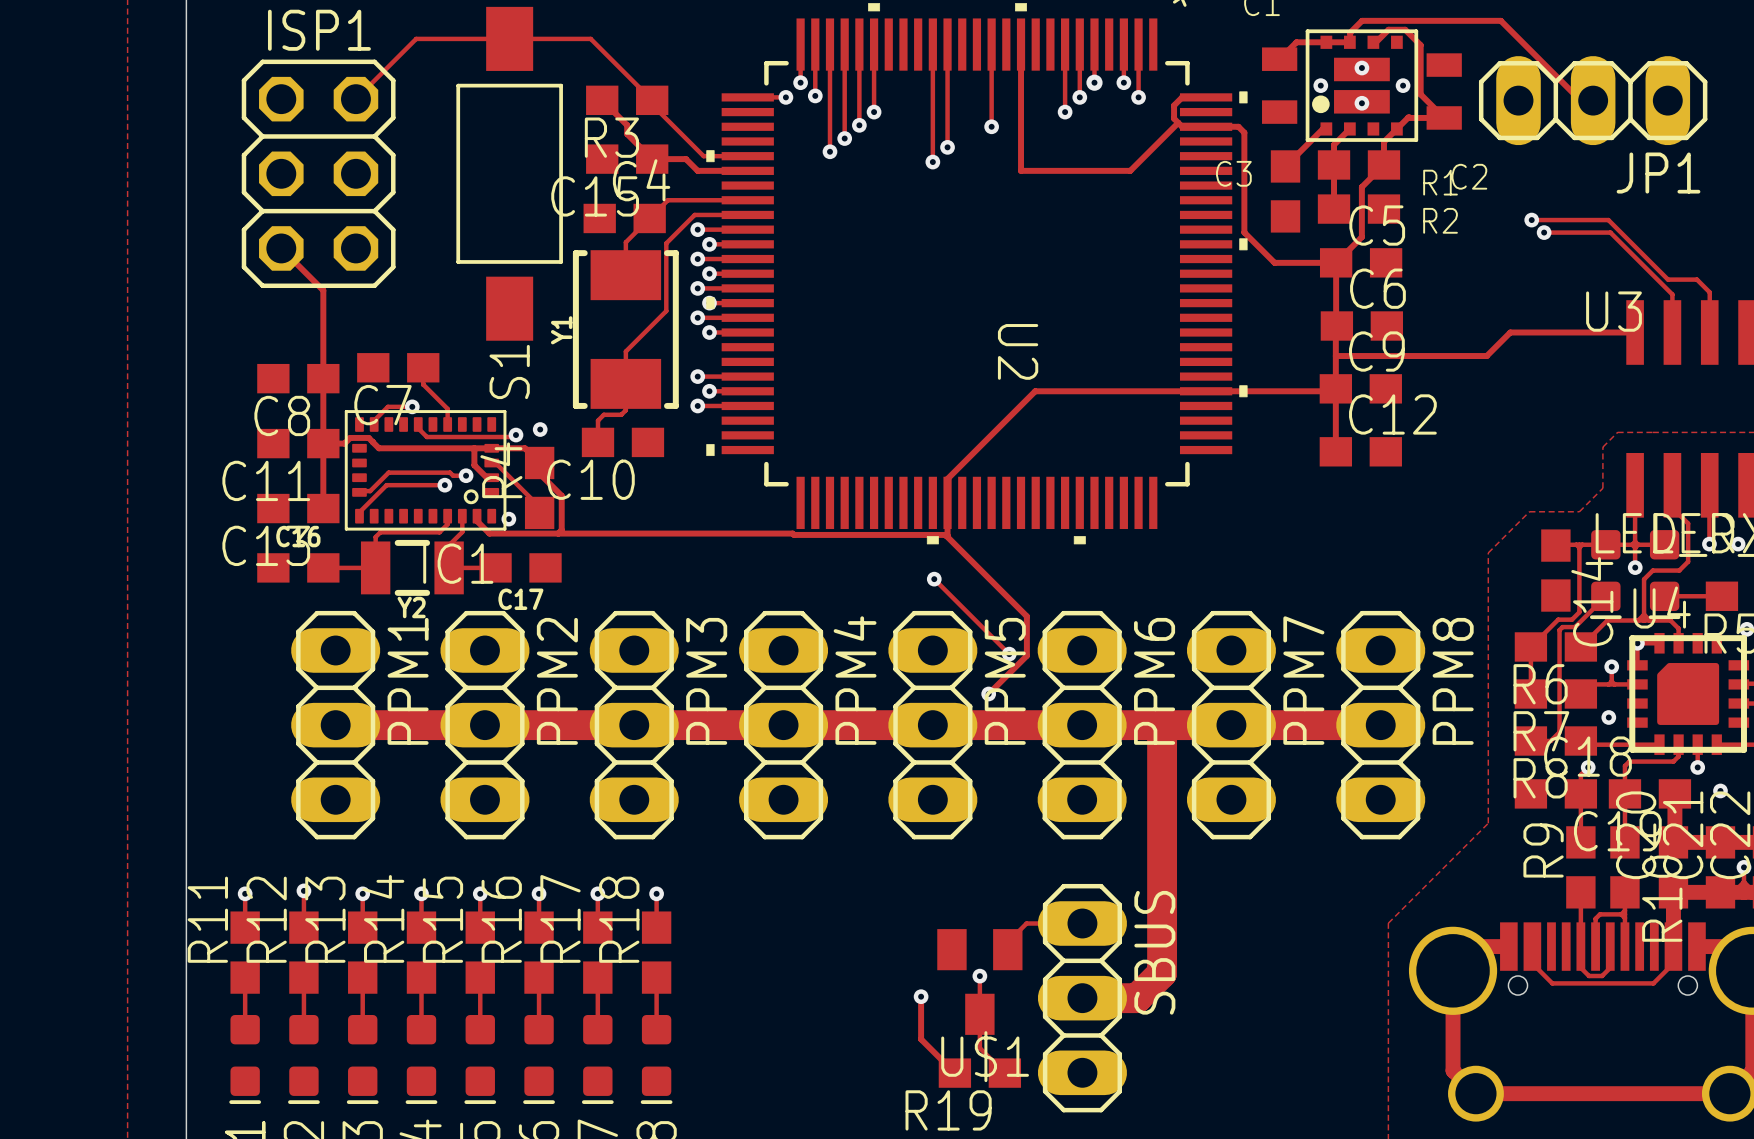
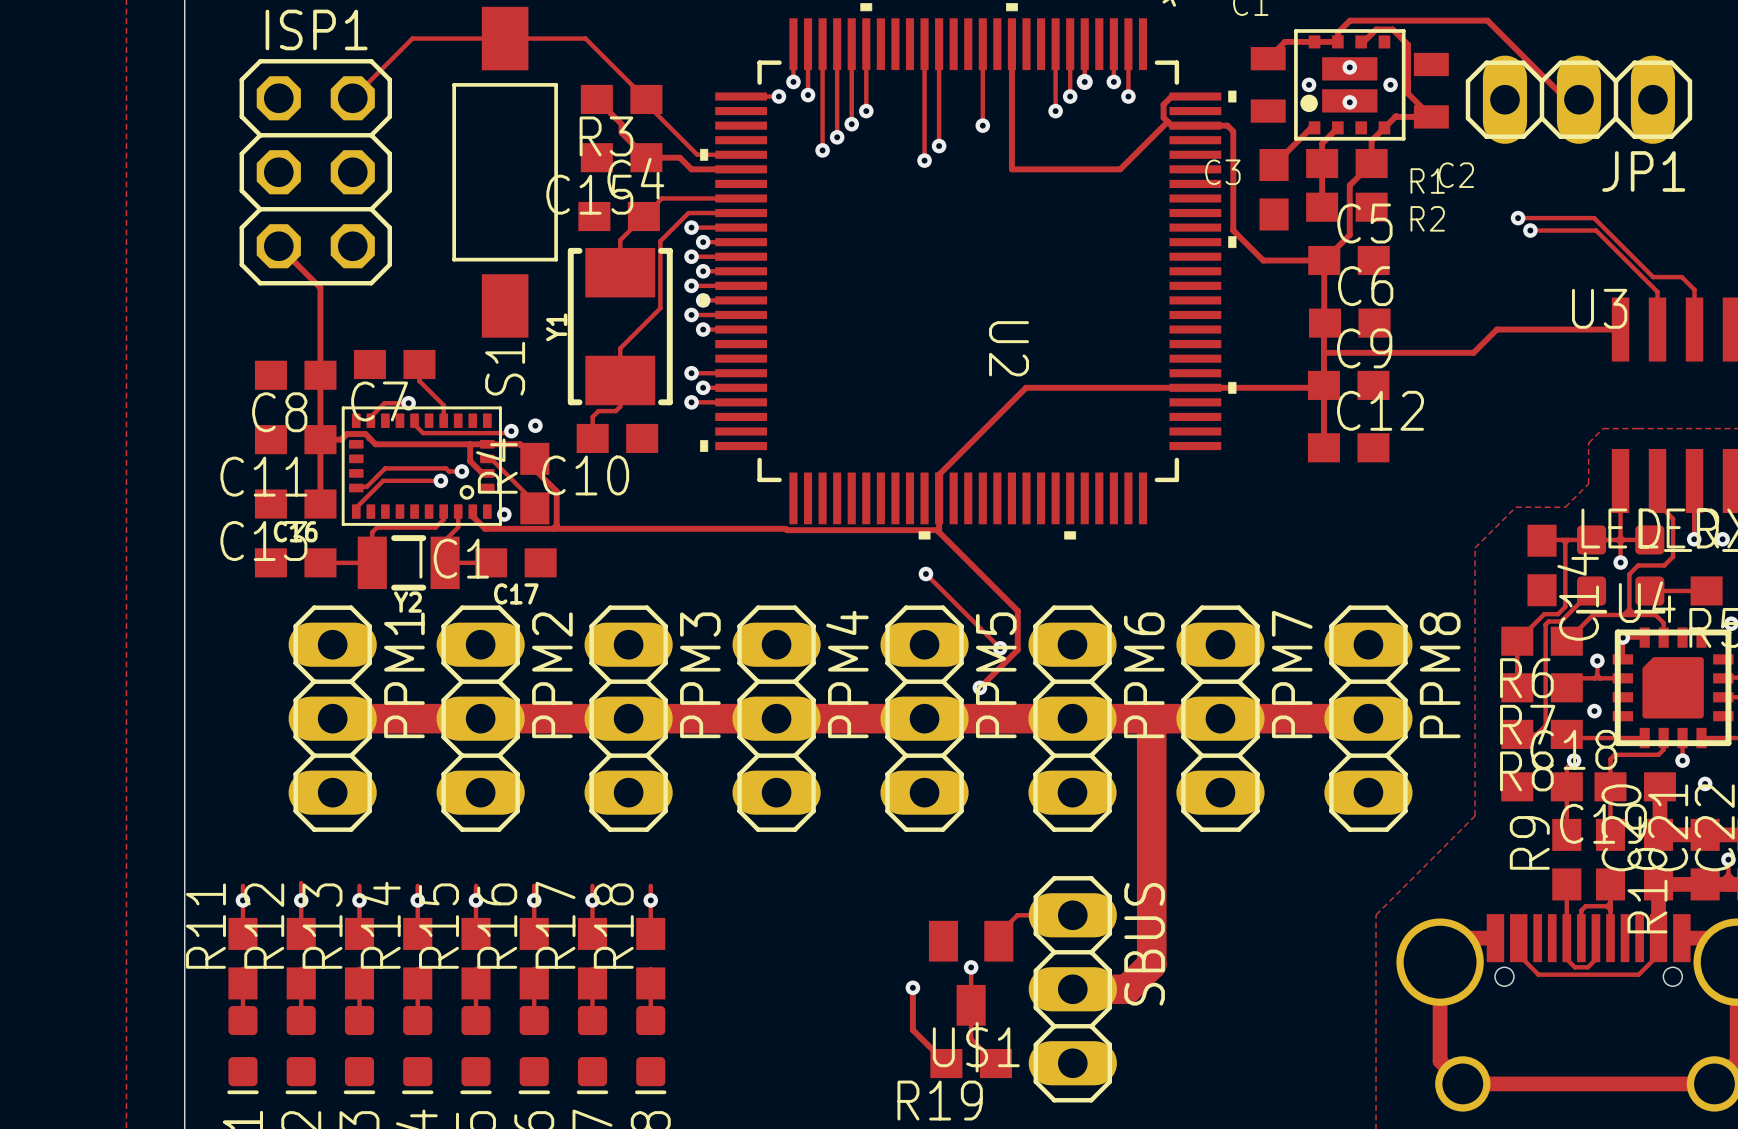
via position: (303, 890) -> (301, 900)
via position: (245, 893) -> (242, 900)
via position: (362, 893) -> (359, 900)
via position: (421, 893) -> (417, 900)
via position: (480, 893) -> (475, 900)
via position: (539, 893) -> (534, 900)
via position: (597, 893) -> (592, 900)
via position: (656, 893) -> (650, 900)
R11 position: (245, 952) -> (242, 958)
R12 position: (303, 952) -> (301, 958)
R13 position: (362, 952) -> (359, 958)
R14 position: (421, 952) -> (417, 958)
R15 position: (480, 952) -> (475, 958)
R16 position: (539, 952) -> (534, 958)
R17 position: (597, 952) -> (592, 958)
R18 position: (656, 952) -> (650, 958)

